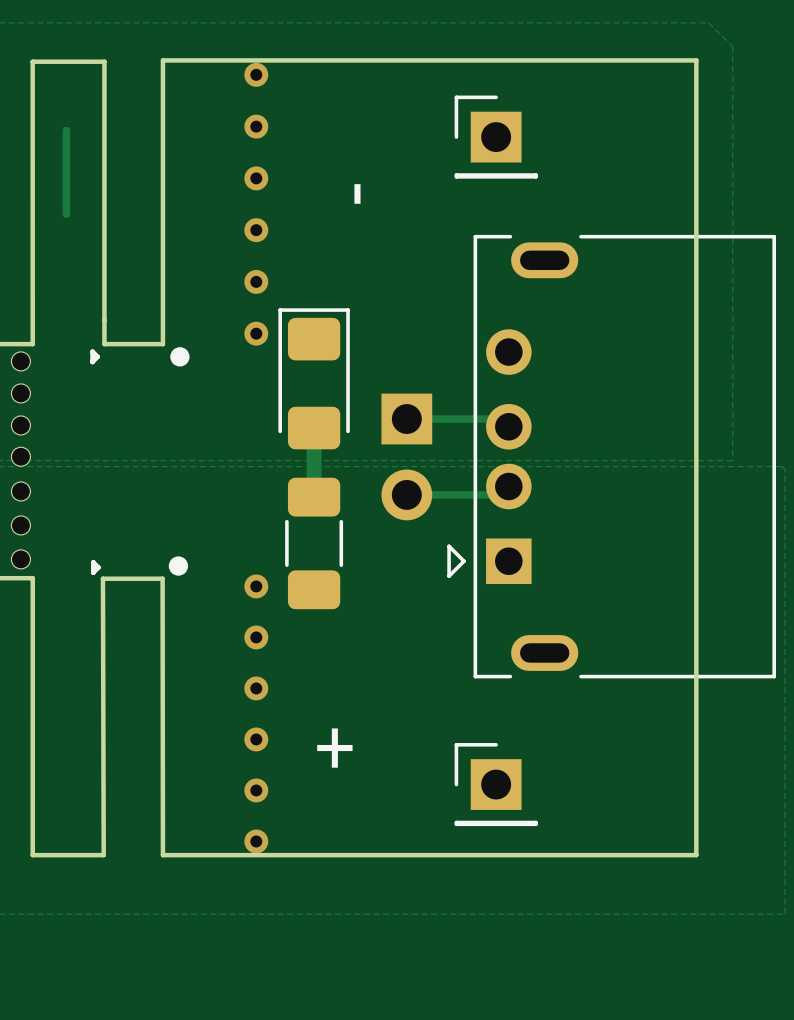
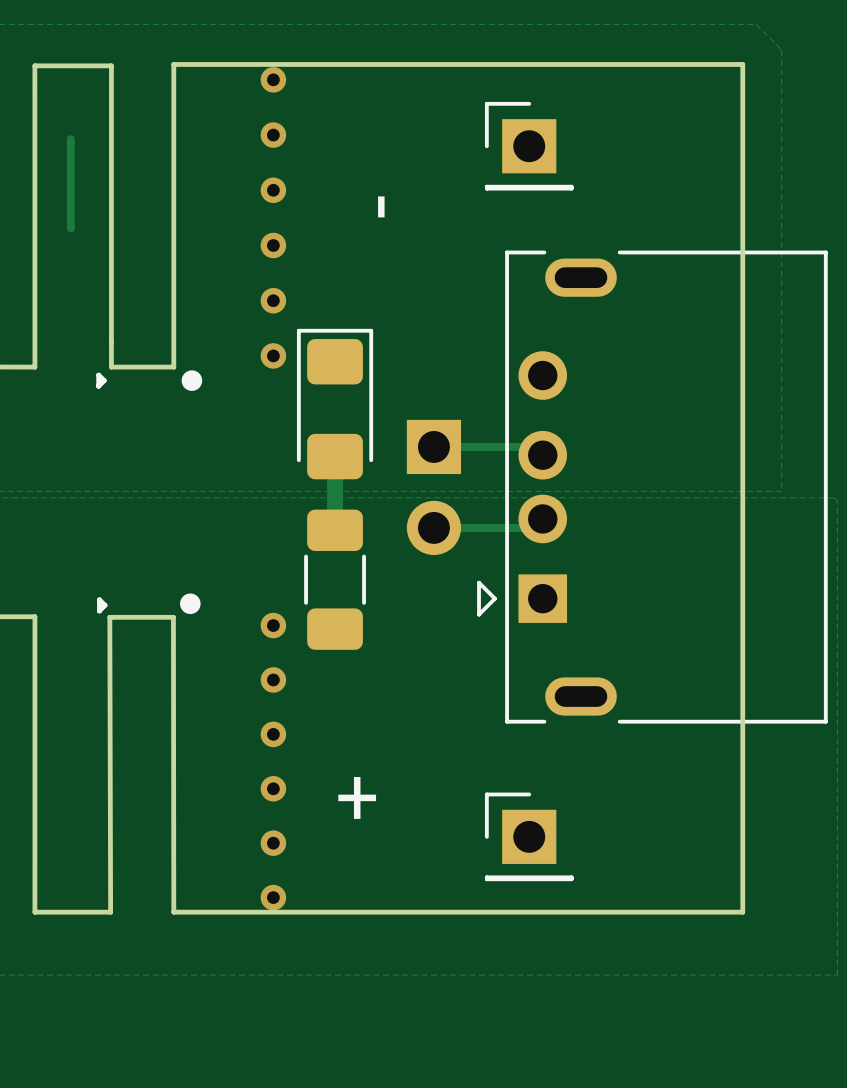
part: (20, 361) -> none
part: (20, 393) -> none
part: (20, 425) -> none
part: (20, 456) -> none
part: (20, 491) -> none
part: (20, 525) -> none
part: (20, 559) -> none

